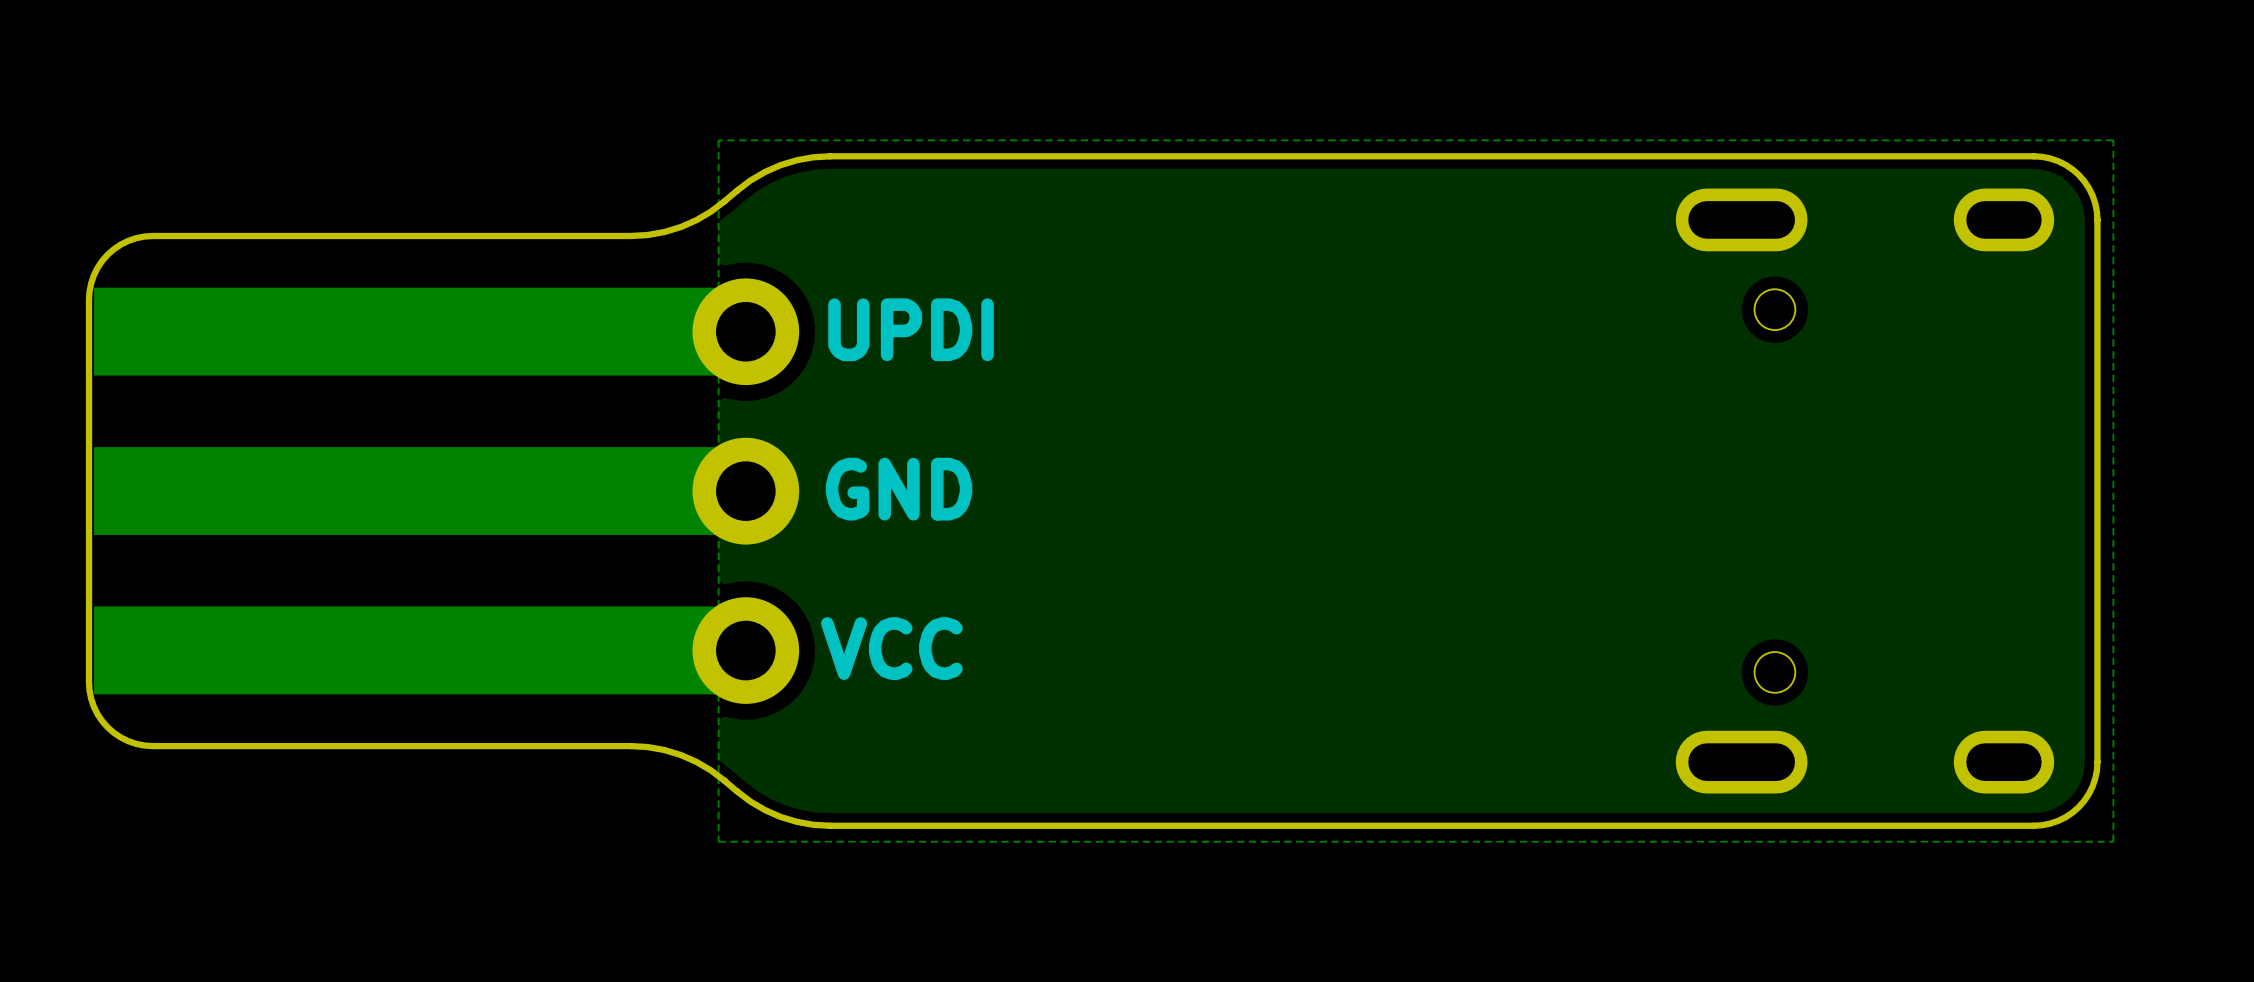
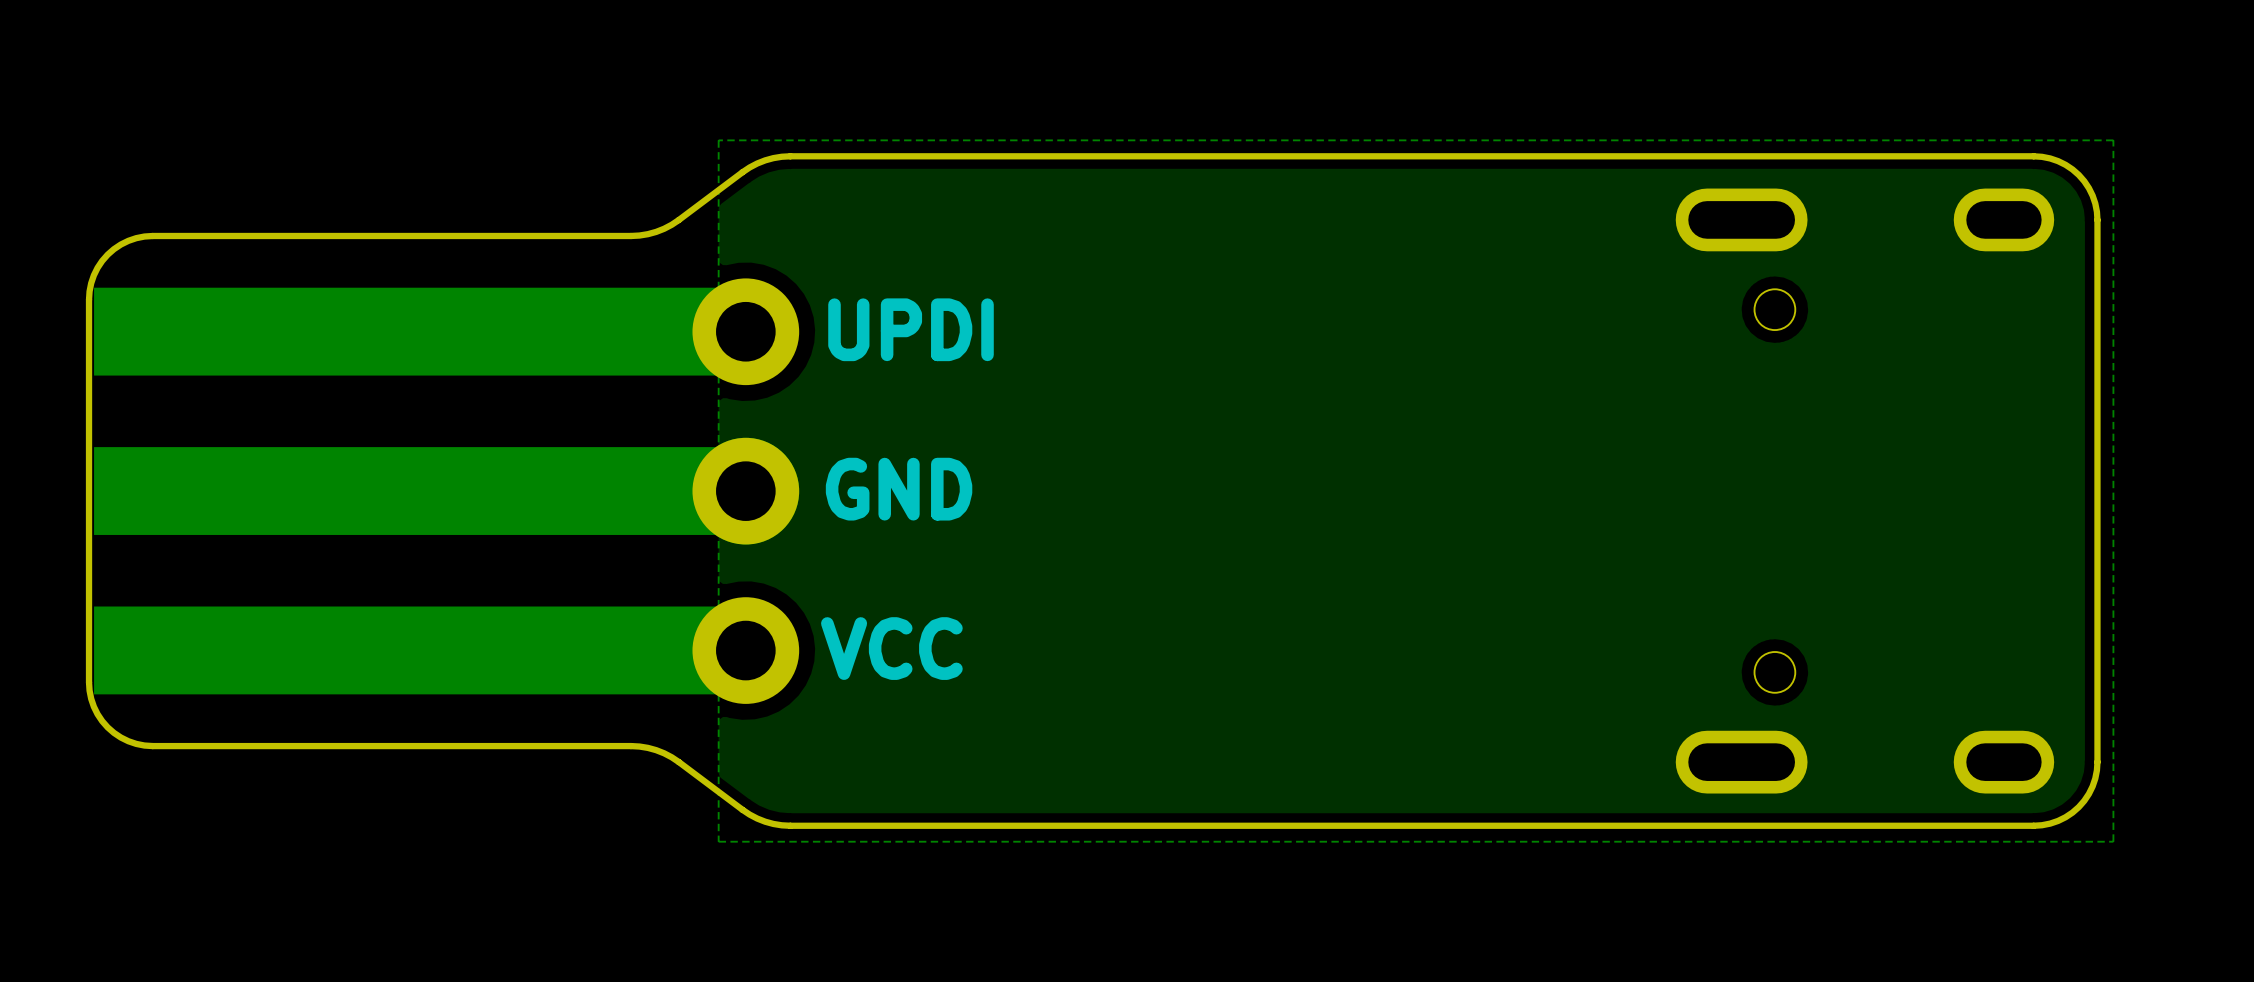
board edge: (830, 156) (796, 160) (780, 165) (750, 180) (710, 211) (696, 220) (664, 232) (630, 235) -> (830, 156) (781, 156) (757, 163) (671, 224) (647, 234) (630, 235)
board edge: (630, 746) (664, 750) (680, 754) (710, 770) (750, 801) (764, 810) (796, 821) (830, 825) -> (630, 746) (656, 750) (671, 757) (757, 818) (781, 825) (830, 825)

